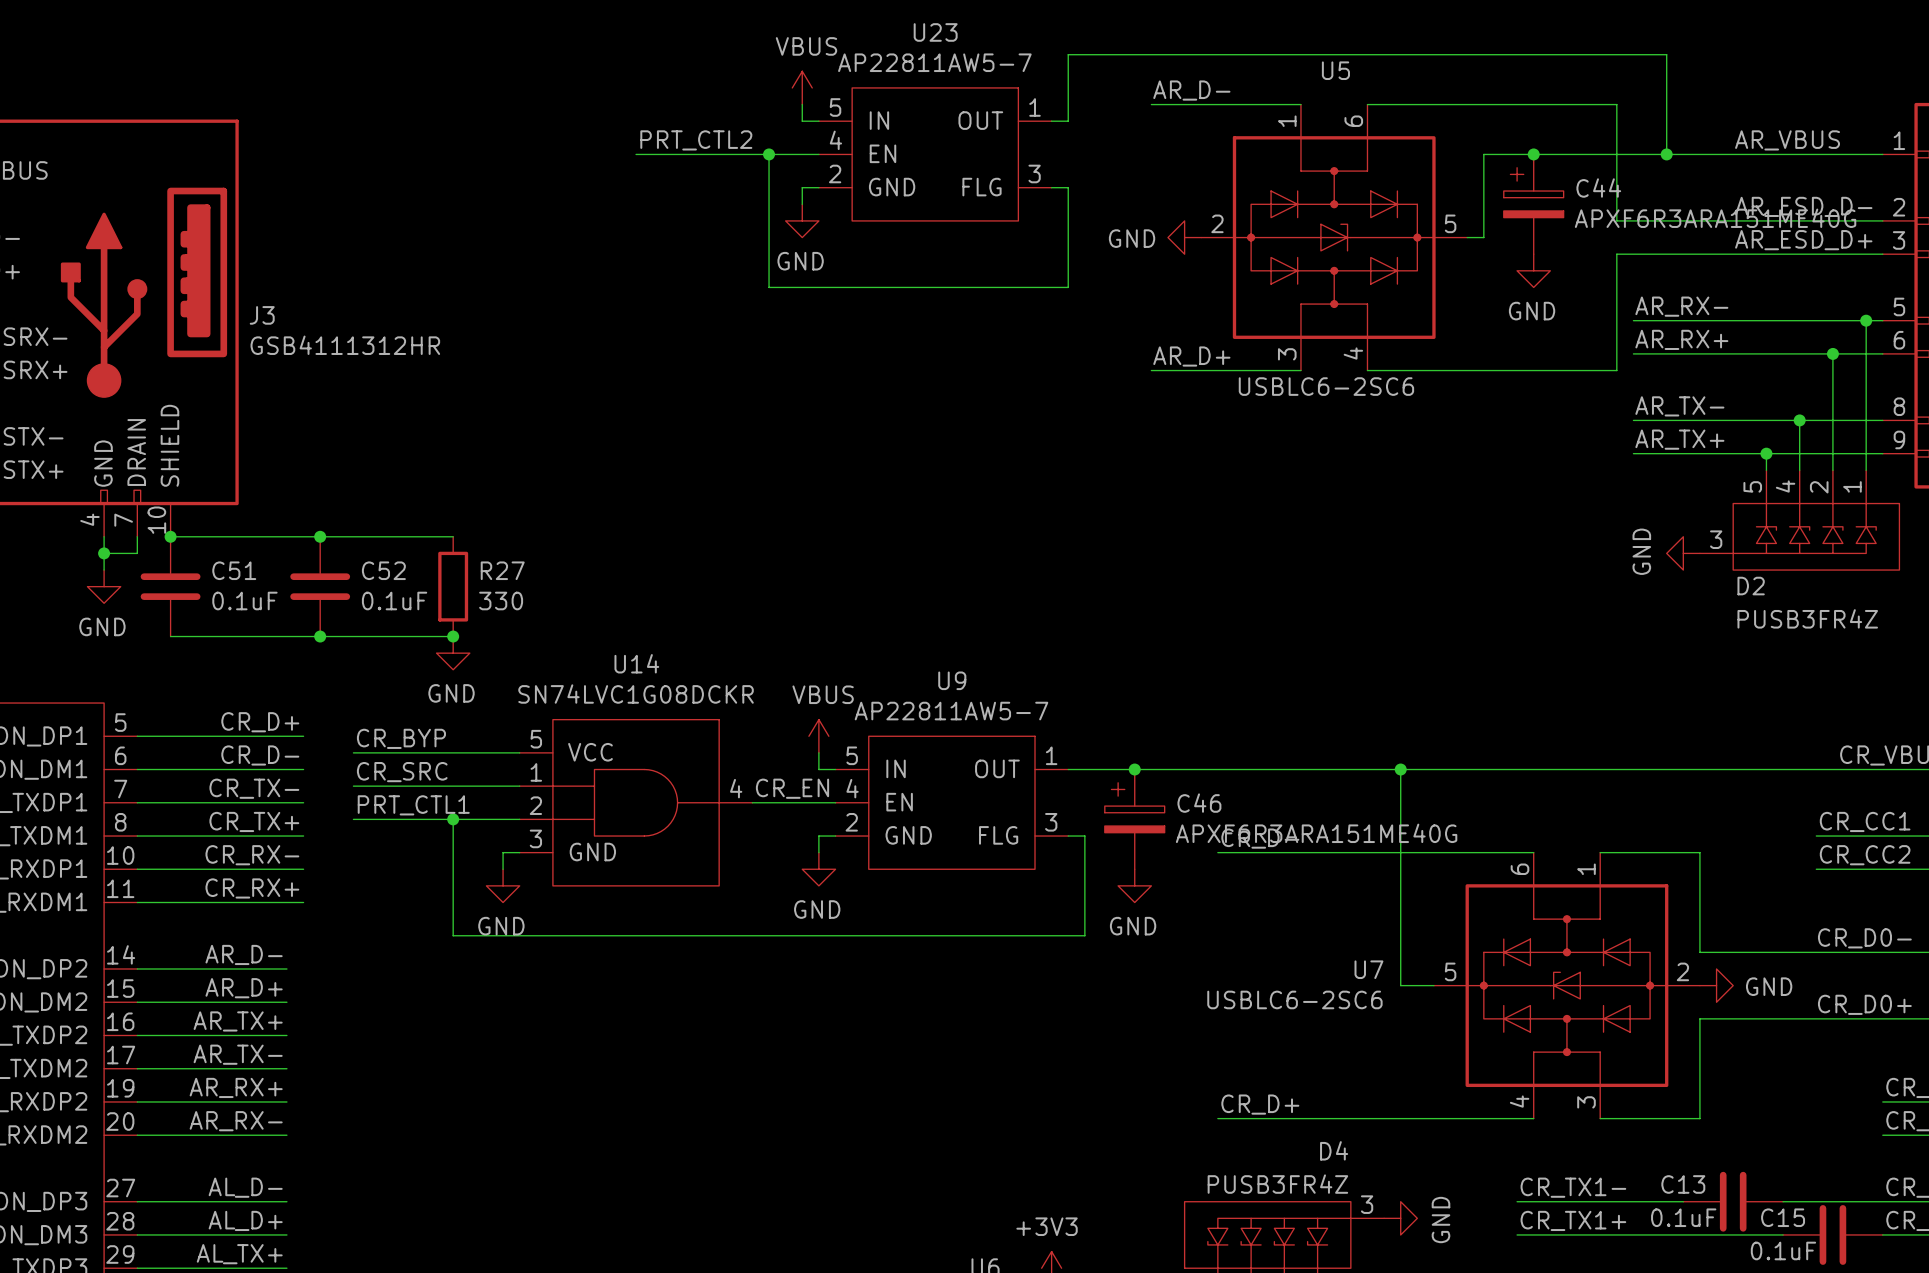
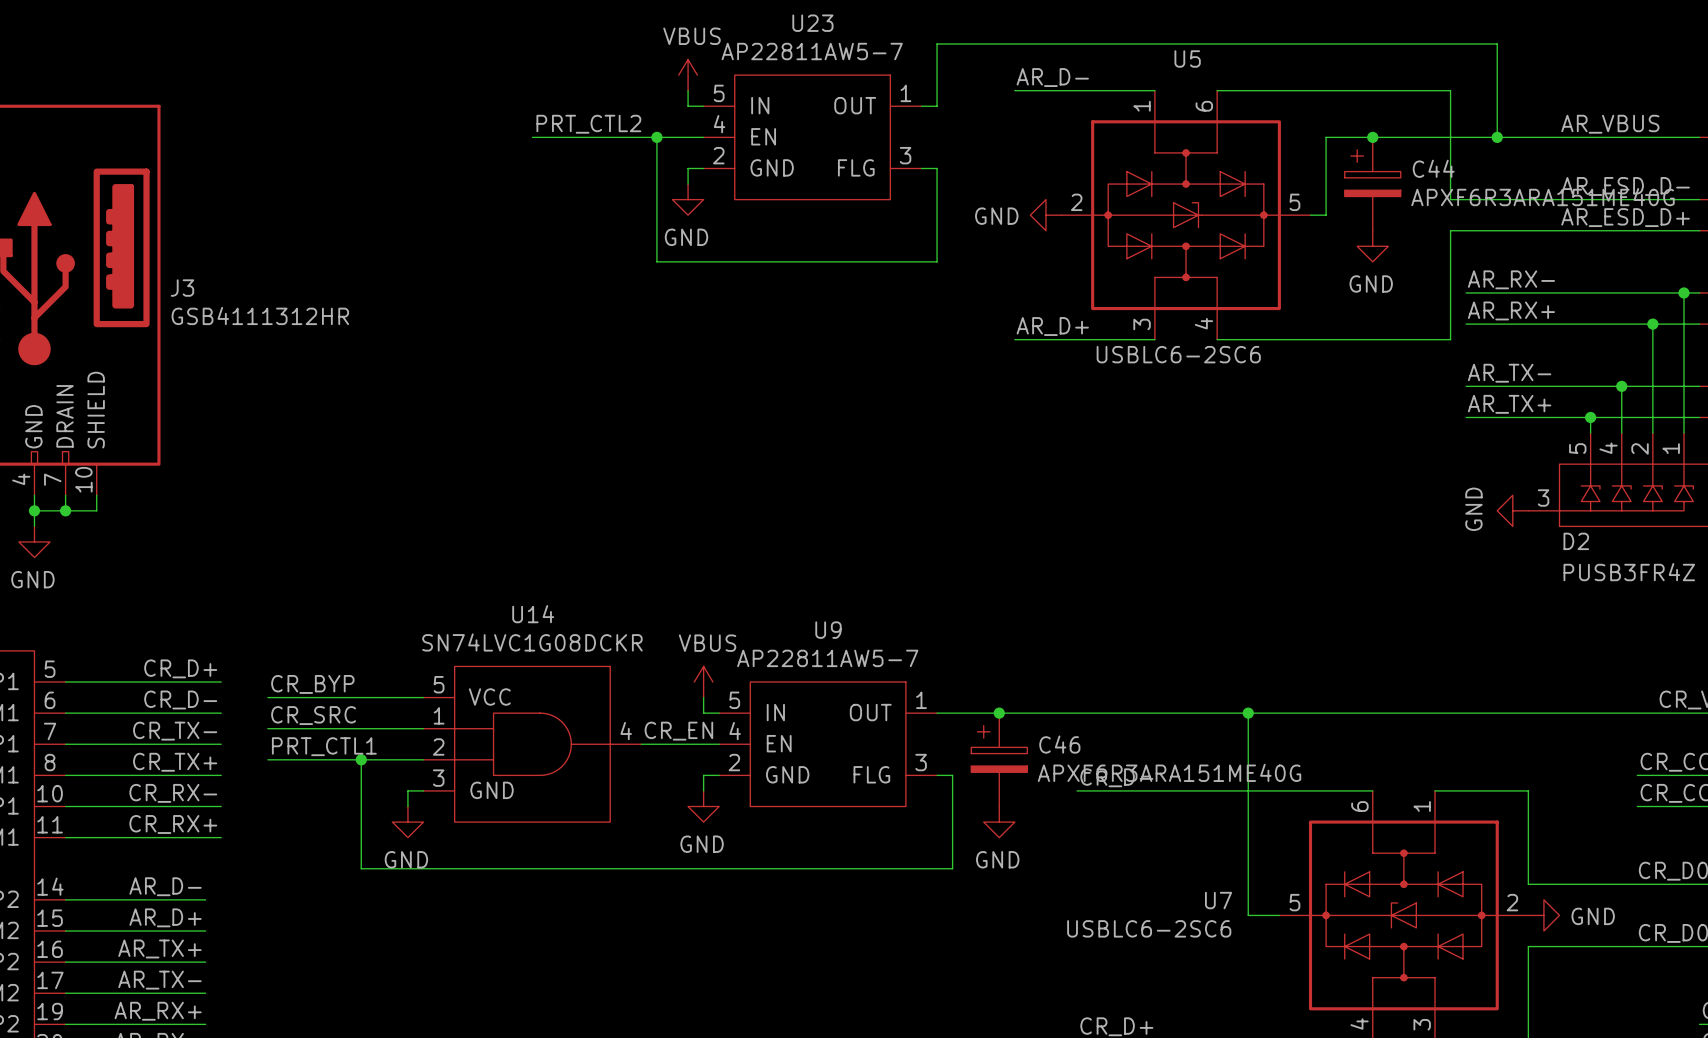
wire: (170, 536) (453, 536) -> (96, 495) (96, 510) (65, 510)
junction position: (170, 536) -> (65, 510)
junction: (320, 536) -> none
C51: 0.1uF (170, 586) -> none
C52: 0.1uF (320, 586) -> none
R27: 330 (453, 586) -> none
wire: (170, 636) (453, 636) -> none
junction: (320, 636) -> none
junction: (453, 636) -> none
power symbol: GND (453, 653) -> none

